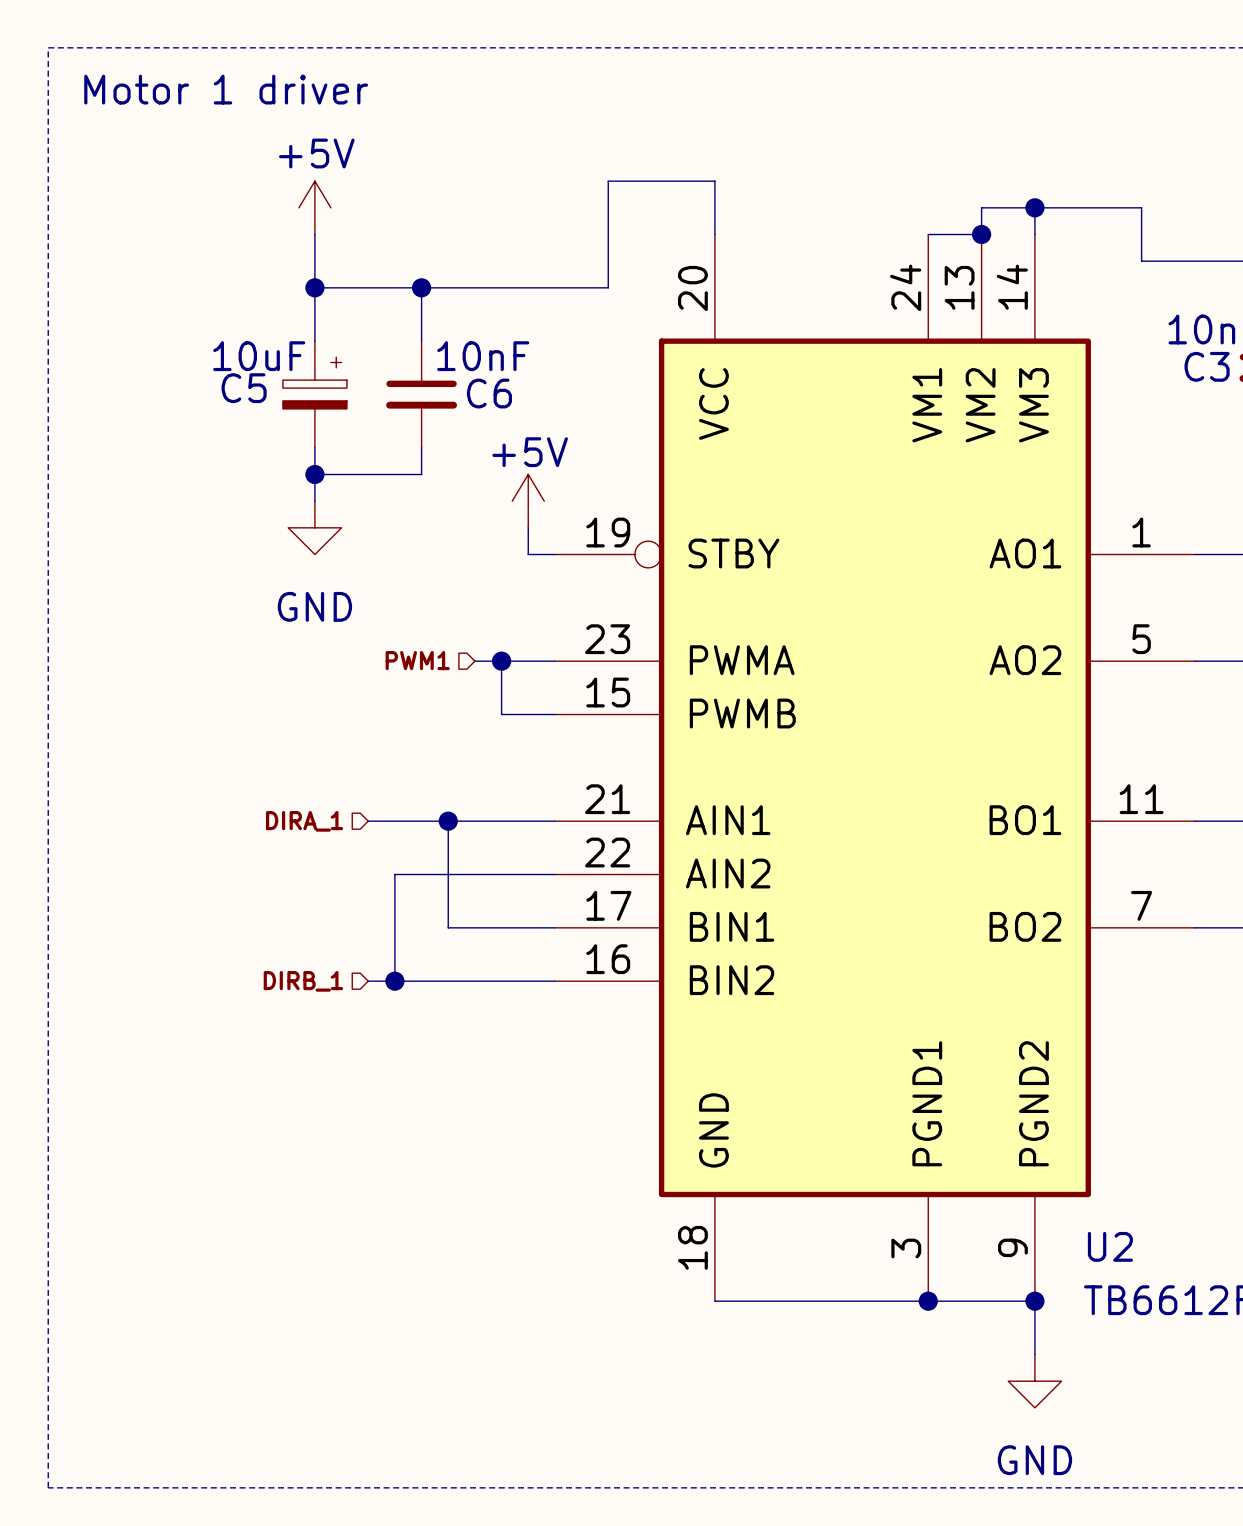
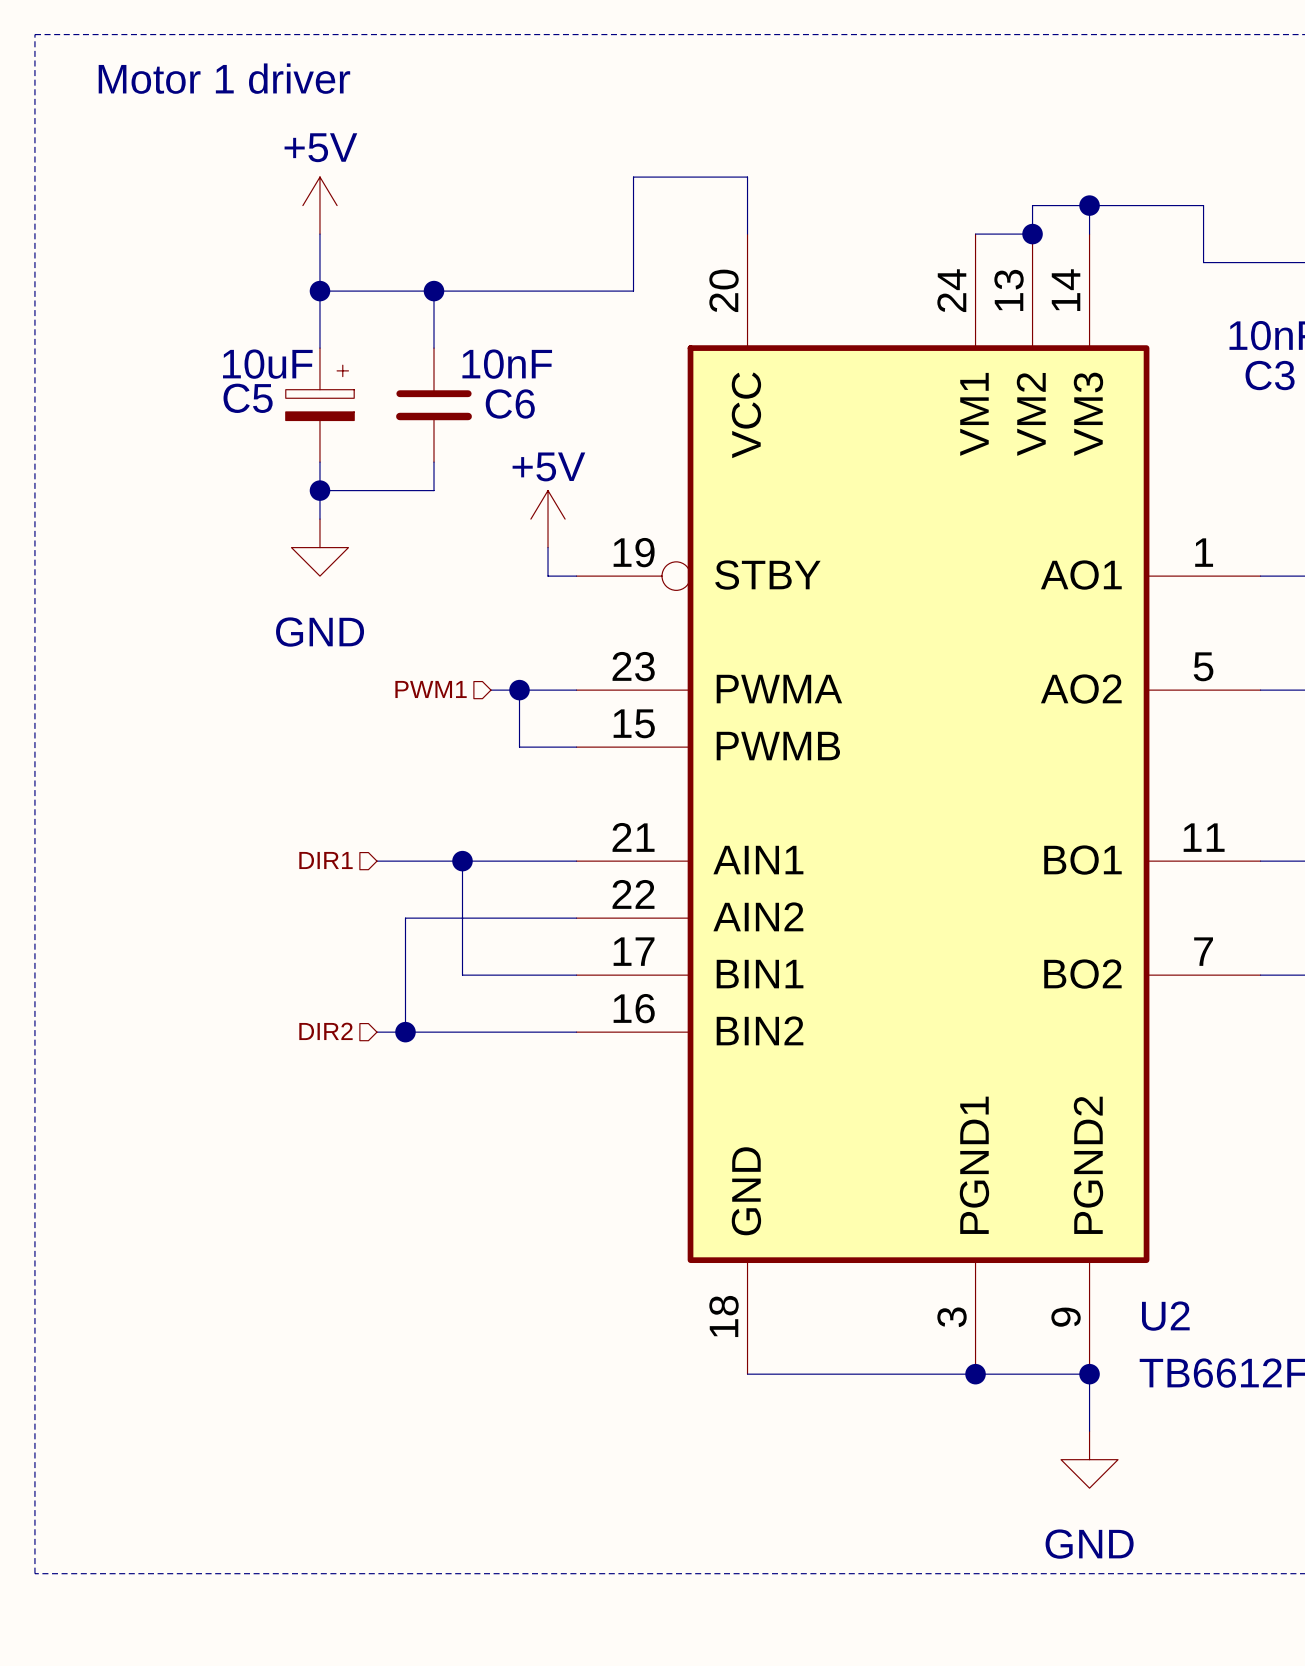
hierarchical label: DIRA_1 (304, 821) -> DIR1 (326, 860)
hierarchical label: DIRB_1 (303, 981) -> DIR2 (325, 1031)

